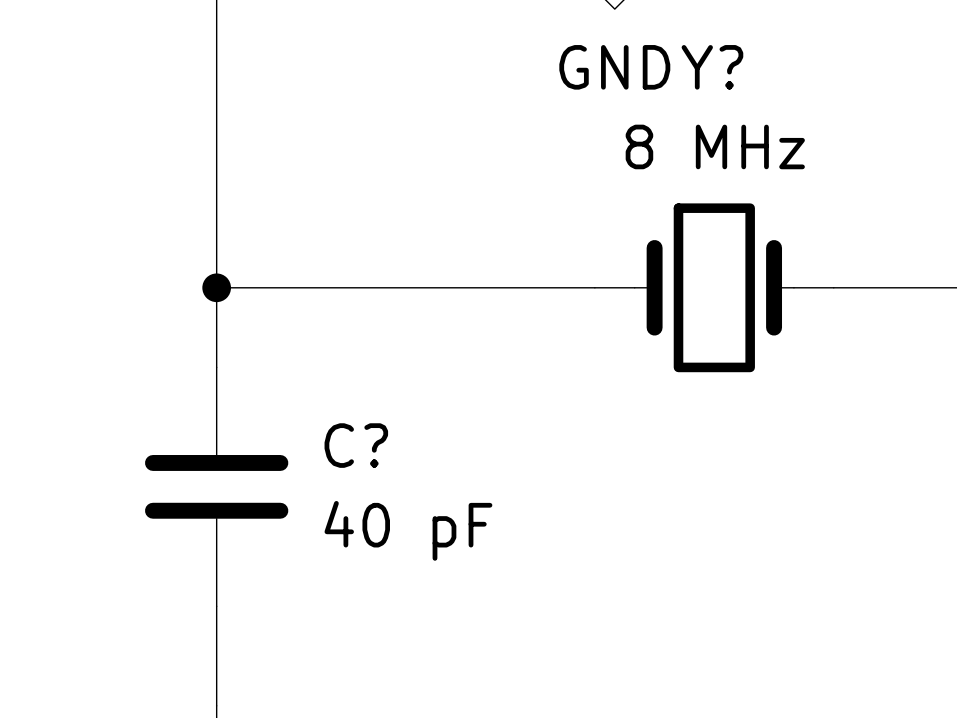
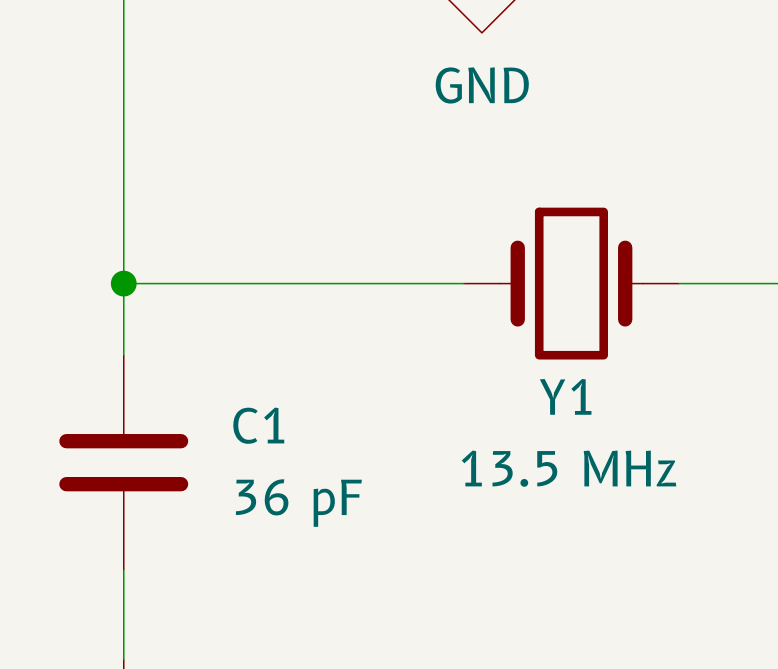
Y? name: Y? (712, 67) -> Y1 (565, 396)
Y? value: 8 MHz (715, 146) -> 13.5 MHz (569, 468)
C? name: C? (356, 445) -> C1 (258, 425)
C? value: 40 pF (408, 530) -> 36 pF (298, 503)

